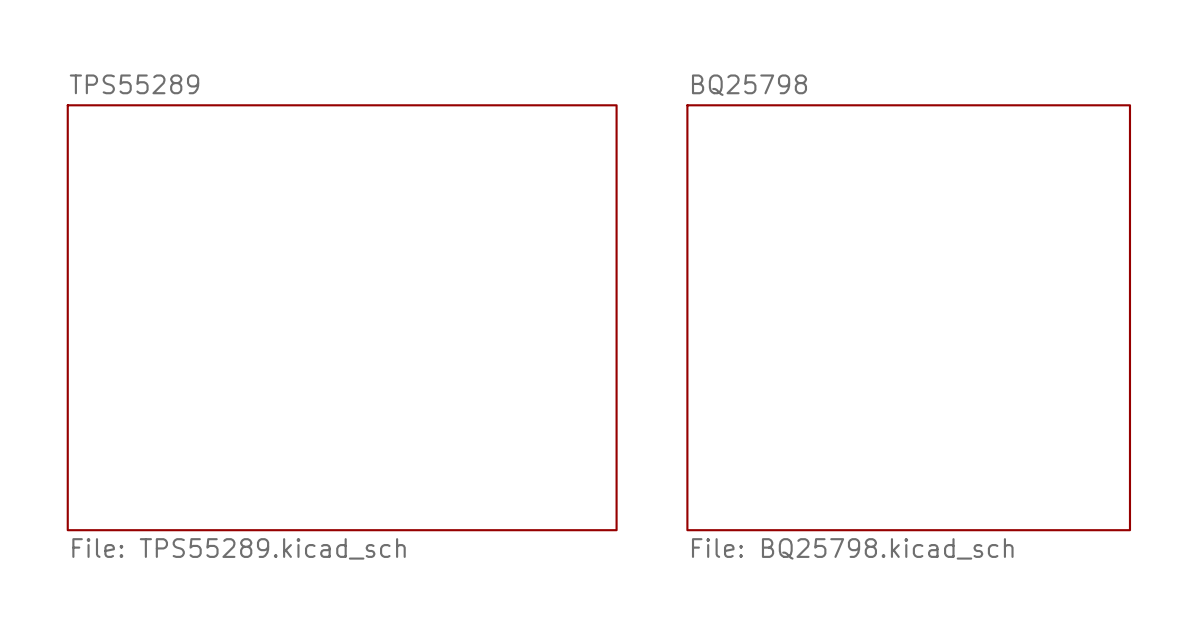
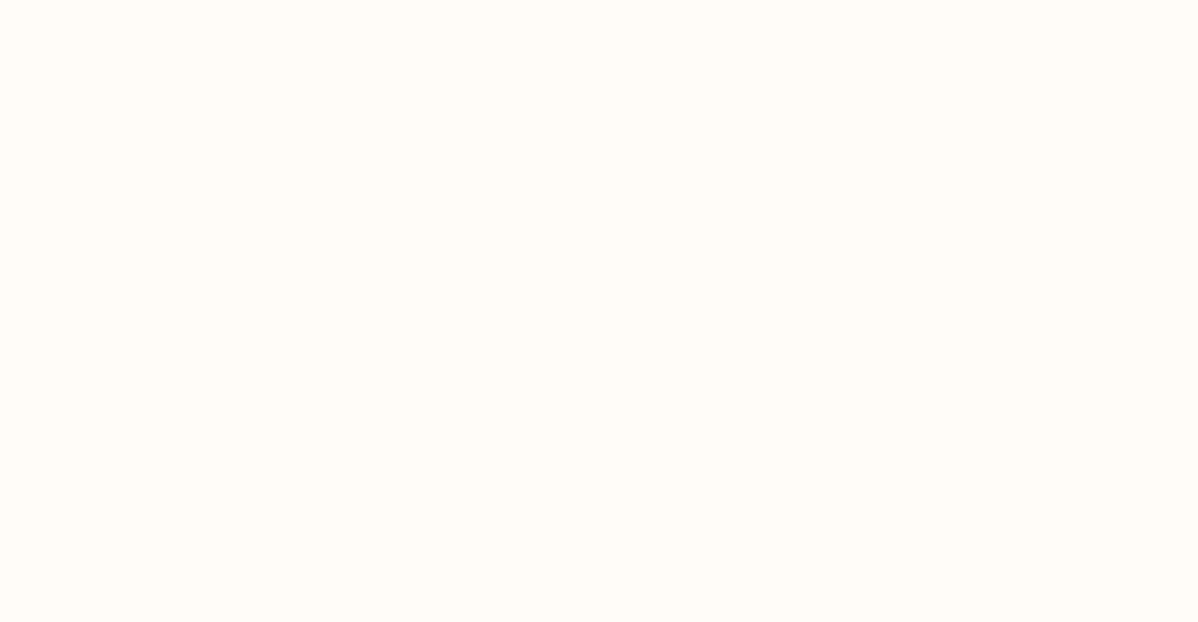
sheet TPS55289: File: TPS55289.kicad_sch (342, 317) -> none
sheet BQ25798: File: BQ25798.kicad_sch (908, 317) -> none

